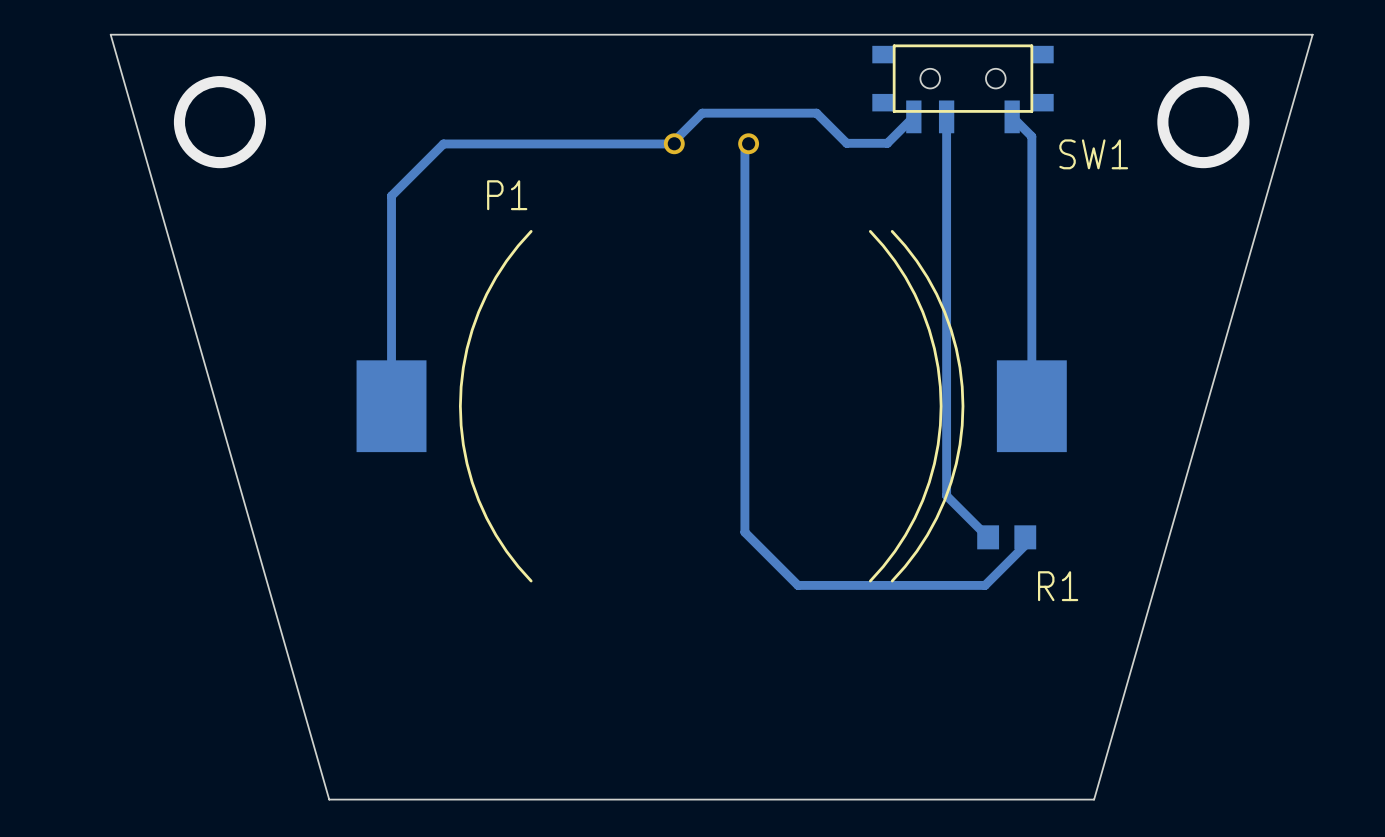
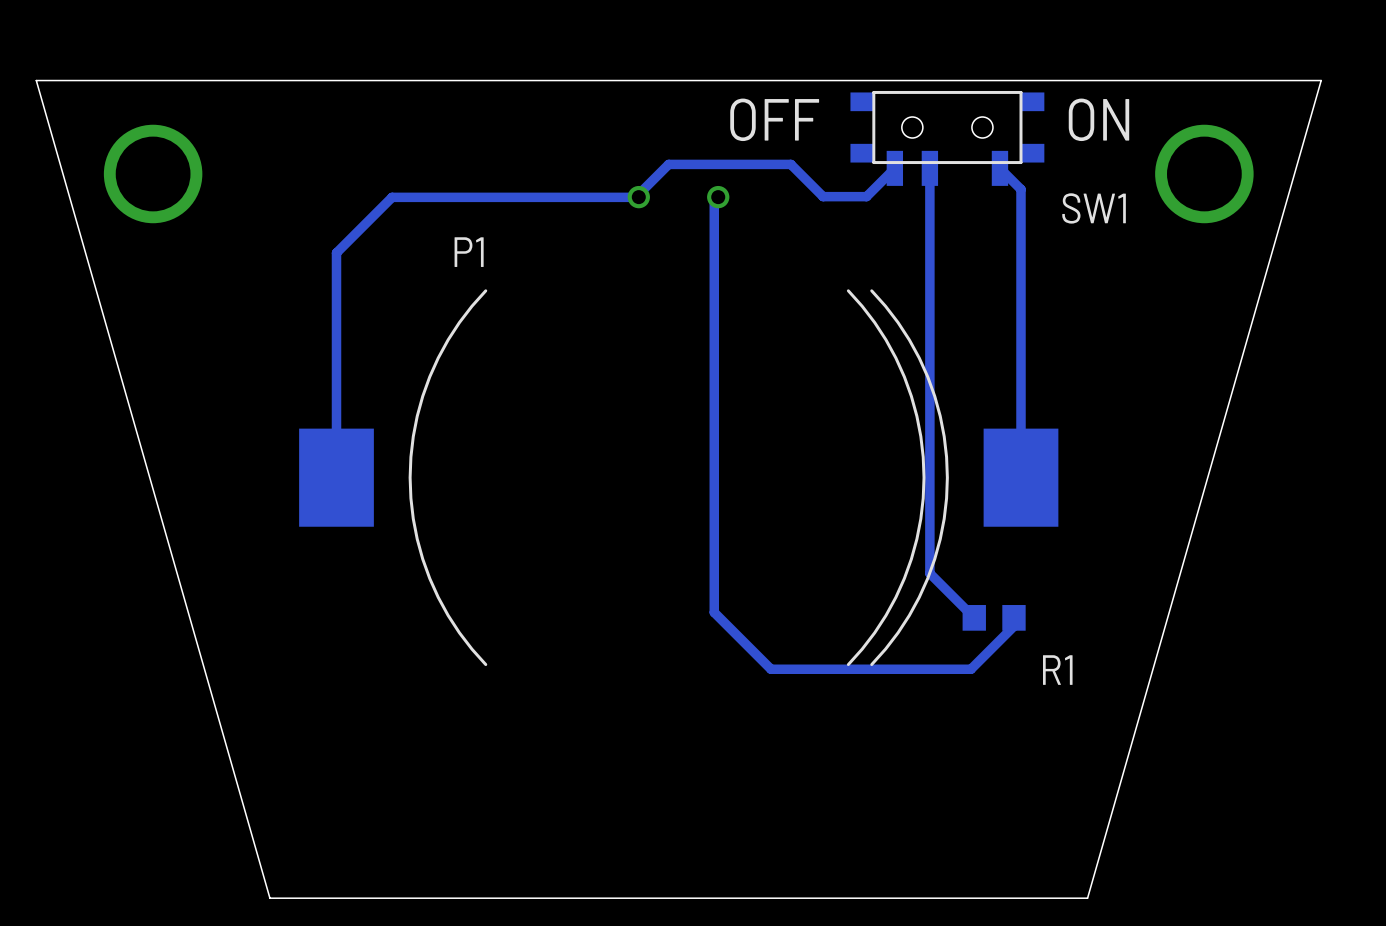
text: none -> OFF (774, 119)
text: none -> ON (1098, 119)

